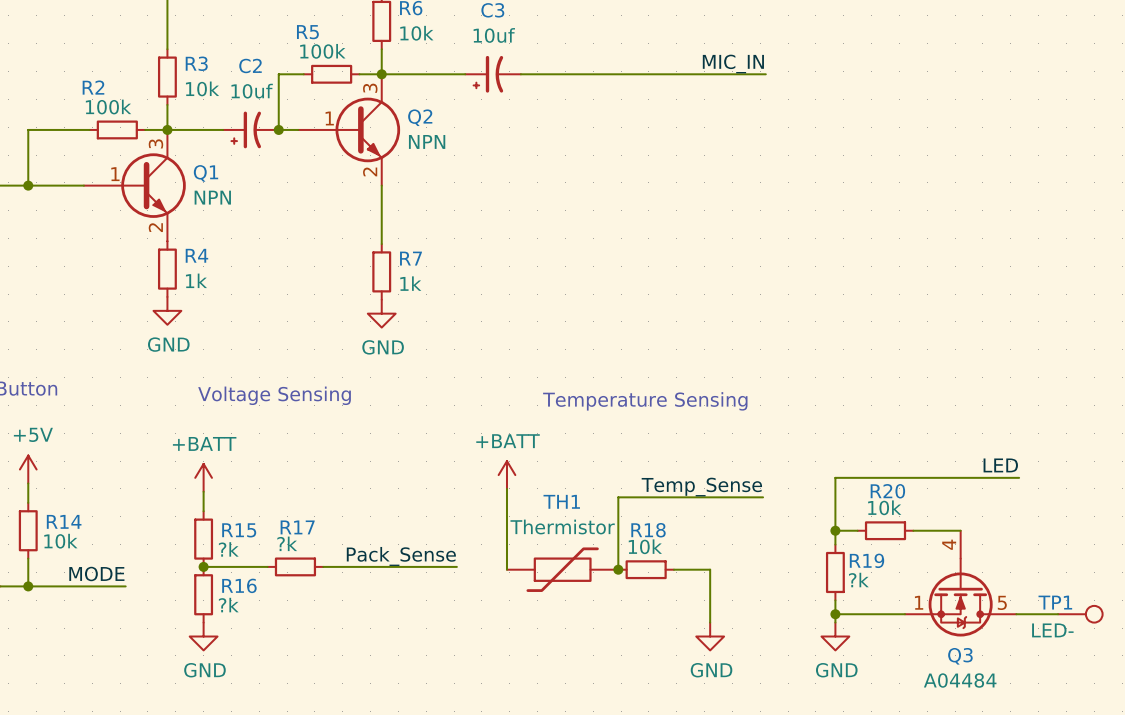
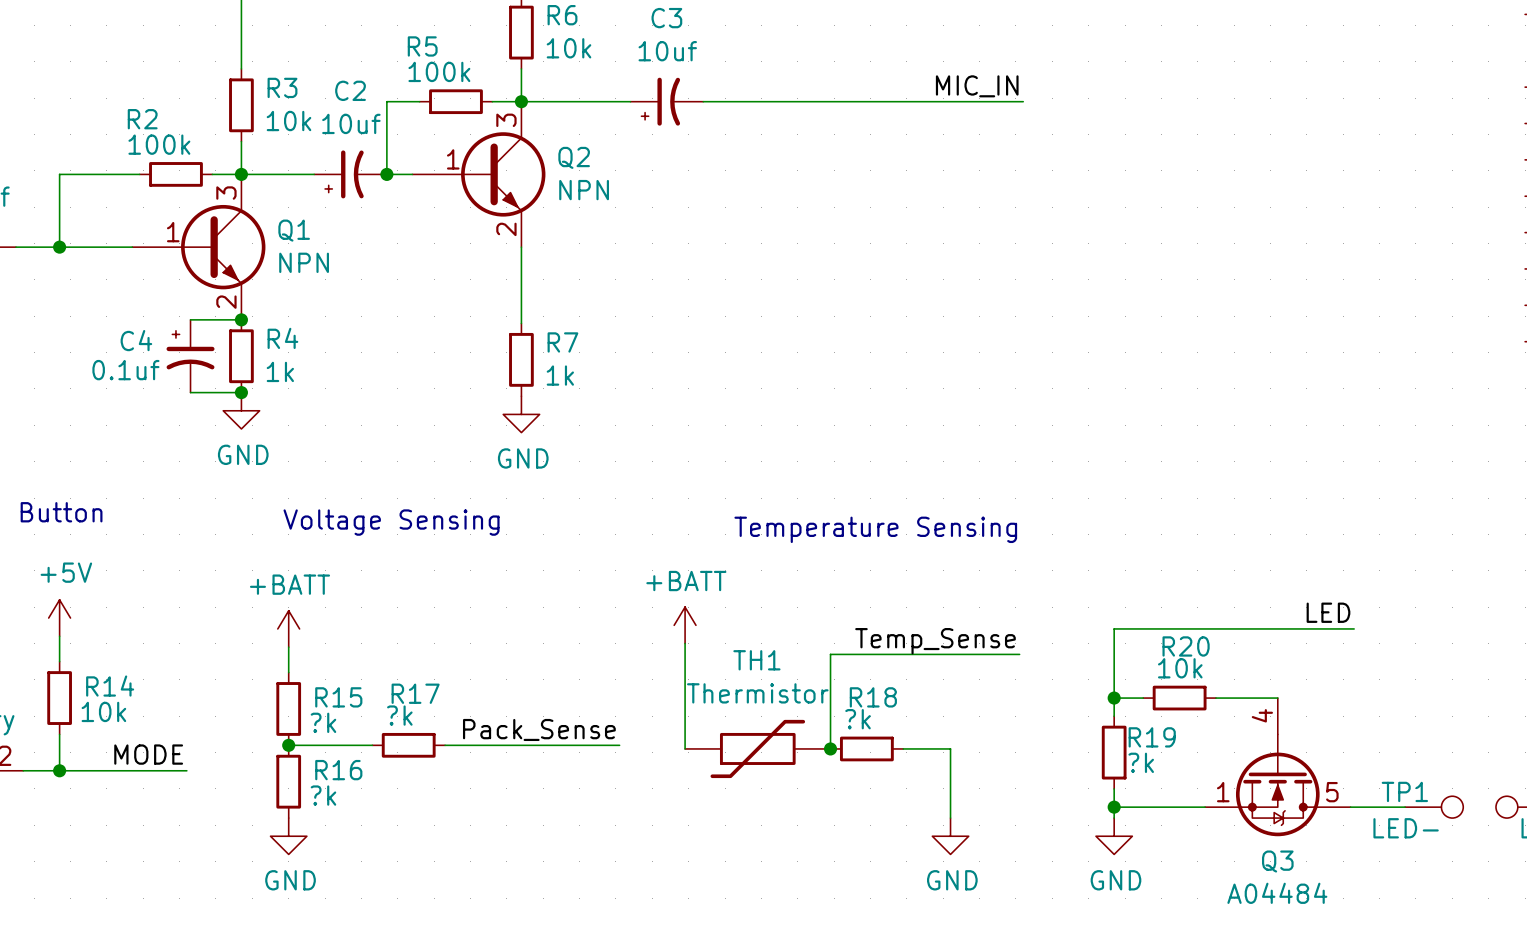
wire: none -> (190, 319) (241, 319)
junction: none -> (241, 319)
C4: none -> 0.1uf (190, 356)
wire: none -> (190, 392) (241, 392)
junction: none -> (241, 392)
R18 value: 10k (645, 546) -> ?k (858, 719)

